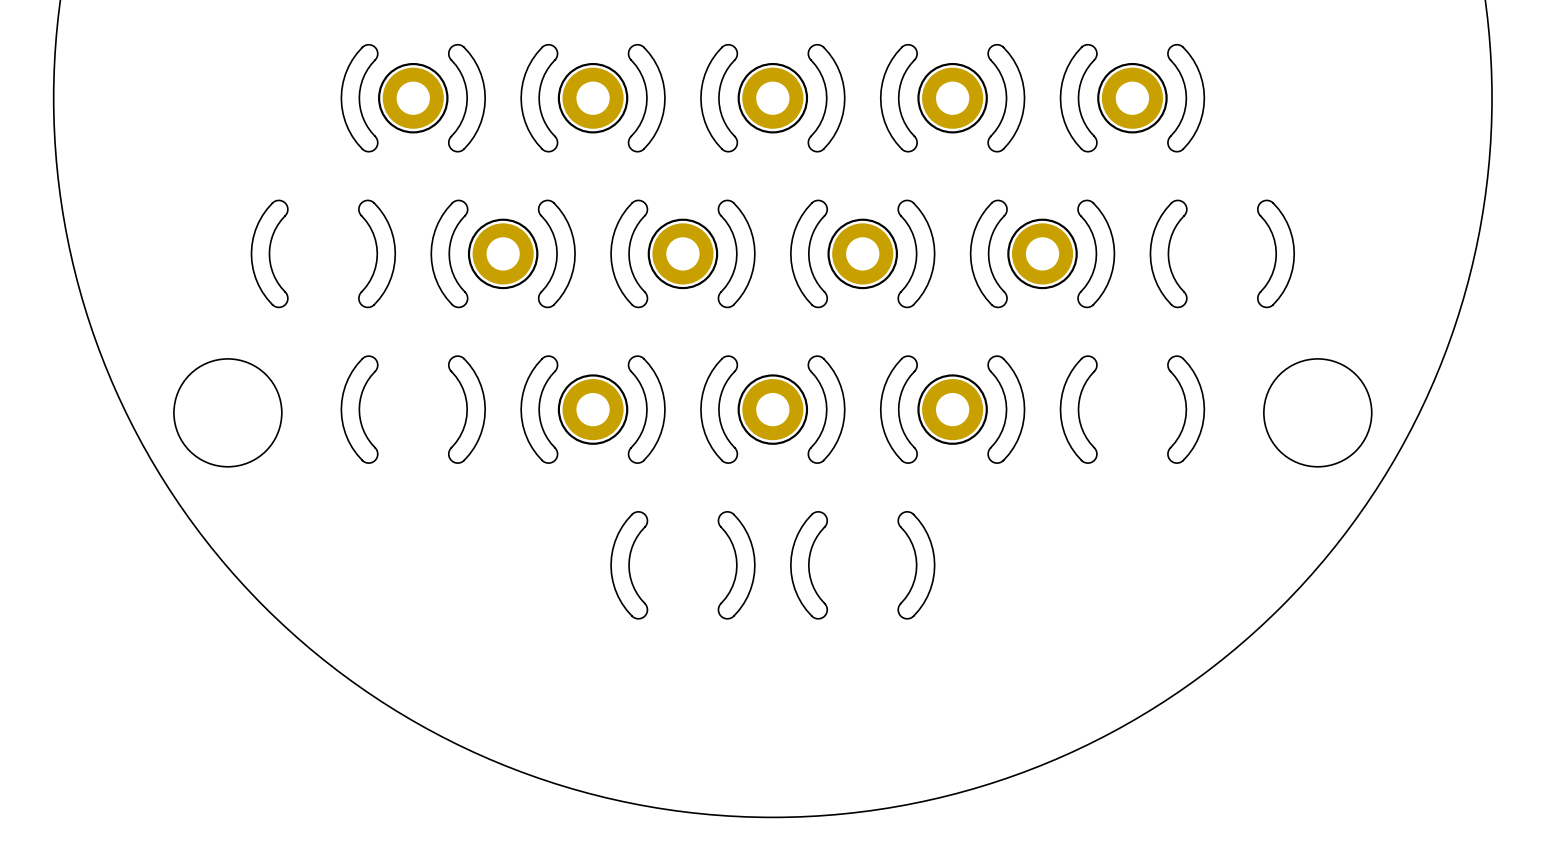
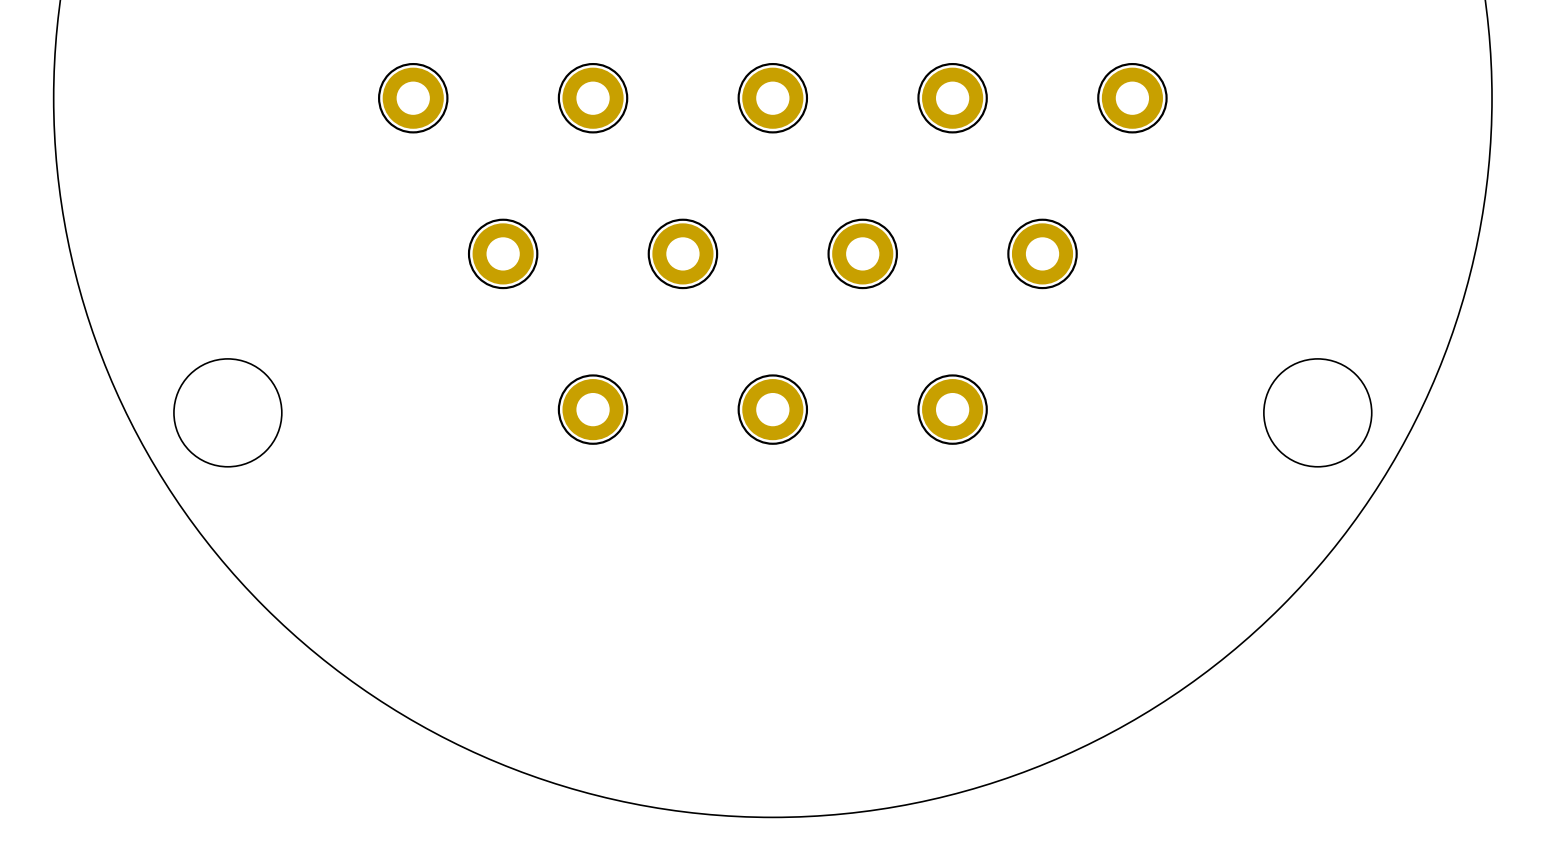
board edge: (362, 47) (367, 44) (372, 45) (377, 53) (376, 58) (364, 74) (359, 92) (362, 116) (377, 141) (375, 148) (369, 151) (363, 149) (352, 136) (345, 121) (341, 106) (341, 90) (345, 74) (352, 59) (362, 47) -> none
board edge: (464, 47) (474, 59) (481, 74) (484, 90) (484, 106) (481, 121) (474, 136) (463, 149) (456, 151) (450, 148) (448, 141) (463, 118) (466, 105) (466, 91) (463, 77) (450, 58) (448, 53) (450, 48) (455, 45) (464, 47) -> none
board edge: (542, 47) (532, 59) (525, 74) (521, 90) (521, 106) (525, 121) (532, 136) (542, 149) (549, 151) (555, 148) (557, 141) (542, 116) (539, 92) (544, 74) (556, 58) (557, 52) (552, 45) (542, 47) -> none
board edge: (643, 47) (635, 45) (628, 52) (629, 58) (642, 77) (646, 91) (646, 105) (642, 118) (628, 141) (630, 148) (636, 151) (643, 149) (653, 136) (660, 121) (664, 106) (664, 90) (660, 74) (653, 59) (643, 47) -> none
board edge: (722, 47) (711, 59) (704, 74) (701, 90) (701, 106) (704, 121) (711, 136) (722, 149) (729, 151) (735, 148) (737, 141) (721, 116) (719, 92) (724, 74) (736, 58) (737, 52) (731, 45) (722, 47) -> none
board edge: (823, 47) (833, 59) (840, 74) (844, 90) (844, 106) (840, 121) (833, 136) (822, 149) (816, 151) (810, 148) (808, 141) (822, 118) (826, 105) (826, 91) (822, 77) (809, 58) (808, 53) (810, 48) (814, 45) (823, 47) -> none
board edge: (901, 47) (911, 45) (917, 52) (915, 58) (904, 74) (899, 92) (901, 116) (916, 141) (915, 148) (908, 151) (901, 149) (891, 136) (884, 121) (881, 106) (881, 90) (884, 74) (891, 59) (901, 47) -> none
board edge: (1003, 47) (994, 45) (988, 52) (989, 58) (1002, 77) (1006, 91) (1006, 105) (1002, 118) (988, 141) (990, 148) (996, 151) (1003, 149) (1013, 136) (1020, 121) (1024, 106) (1024, 90) (1020, 74) (1013, 59) (1003, 47) -> none
board edge: (1081, 47) (1071, 59) (1064, 74) (1060, 90) (1060, 106) (1064, 121) (1071, 136) (1081, 149) (1088, 151) (1095, 148) (1096, 141) (1081, 116) (1078, 92) (1083, 74) (1095, 58) (1096, 52) (1091, 45) (1081, 47) -> none
board edge: (1183, 47) (1193, 59) (1200, 74) (1203, 90) (1203, 106) (1200, 121) (1193, 136) (1182, 149) (1175, 151) (1169, 148) (1168, 141) (1182, 118) (1185, 105) (1185, 91) (1182, 77) (1169, 58) (1168, 52) (1174, 45) (1183, 47) -> none
board edge: (272, 203) (262, 215) (255, 230) (251, 245) (251, 261) (255, 277) (262, 292) (273, 305) (280, 307) (286, 303) (287, 297) (272, 271) (269, 247) (274, 230) (286, 213) (287, 208) (282, 201) (272, 203) -> none
board edge: (374, 203) (365, 200) (358, 208) (360, 213) (373, 233) (376, 246) (376, 260) (373, 274) (359, 296) (360, 303) (367, 307) (374, 304) (384, 292) (391, 277) (394, 261) (394, 245) (391, 230) (384, 215) (374, 203) -> none
board edge: (452, 203) (457, 200) (462, 201) (467, 208) (466, 214) (454, 230) (449, 247) (452, 271) (467, 297) (465, 303) (459, 307) (453, 305) (442, 292) (435, 277) (431, 261) (431, 245) (435, 230) (442, 215) (452, 203) -> none
board edge: (554, 203) (544, 200) (540, 203) (538, 208) (539, 214) (553, 233) (556, 246) (556, 260) (553, 274) (538, 297) (540, 303) (546, 307) (553, 305) (564, 292) (571, 277) (574, 261) (574, 245) (571, 230) (564, 215) (554, 203) -> none
board edge: (632, 203) (622, 215) (615, 230) (611, 245) (611, 261) (615, 277) (622, 292) (632, 304) (639, 307) (645, 303) (647, 296) (632, 271) (629, 247) (634, 230) (646, 214) (647, 208) (642, 201) (636, 200) (632, 203) -> none
board edge: (733, 203) (743, 215) (750, 230) (754, 245) (754, 261) (750, 277) (743, 292) (733, 304) (726, 307) (720, 303) (718, 296) (732, 274) (736, 260) (736, 246) (732, 233) (719, 213) (718, 208) (725, 200) (733, 203) -> none
board edge: (811, 203) (816, 200) (821, 201) (827, 208) (825, 214) (814, 230) (809, 247) (811, 271) (827, 296) (825, 303) (818, 307) (811, 304) (801, 292) (794, 277) (791, 261) (791, 245) (794, 230) (801, 215) (811, 203) -> none
board edge: (913, 203) (923, 215) (930, 230) (934, 245) (934, 261) (930, 277) (923, 292) (912, 305) (906, 307) (900, 303) (898, 297) (912, 274) (916, 260) (916, 246) (912, 233) (899, 214) (898, 208) (900, 203) (904, 200) (913, 203) -> none
board edge: (991, 203) (996, 200) (1001, 201) (1007, 208) (1005, 214) (993, 230) (988, 247) (991, 271) (1006, 296) (1005, 303) (998, 307) (991, 304) (981, 292) (974, 277) (971, 261) (971, 245) (974, 230) (981, 215) (991, 203) -> none
board edge: (1093, 203) (1084, 200) (1078, 208) (1079, 213) (1092, 233) (1096, 246) (1096, 260) (1092, 274) (1078, 296) (1079, 303) (1086, 307) (1093, 304) (1103, 292) (1110, 277) (1114, 261) (1114, 245) (1110, 230) (1103, 215) (1093, 203) -> none
board edge: (1171, 203) (1161, 215) (1154, 230) (1150, 245) (1150, 261) (1154, 277) (1161, 292) (1171, 304) (1178, 307) (1184, 303) (1186, 296) (1171, 271) (1168, 247) (1173, 230) (1185, 213) (1186, 208) (1181, 201) (1171, 203) -> none
board edge: (1273, 203) (1283, 215) (1290, 230) (1293, 245) (1293, 261) (1290, 277) (1283, 292) (1272, 305) (1265, 307) (1259, 303) (1257, 297) (1272, 274) (1275, 260) (1275, 246) (1272, 233) (1259, 214) (1257, 208) (1259, 203) (1264, 200) (1273, 203) -> none
board edge: (362, 358) (372, 356) (377, 363) (376, 369) (364, 386) (359, 403) (362, 427) (377, 452) (375, 459) (369, 463) (362, 460) (352, 447) (345, 433) (341, 417) (341, 401) (345, 385) (352, 371) (362, 358) -> none
board edge: (464, 358) (474, 371) (481, 385) (484, 401) (484, 417) (481, 433) (474, 447) (464, 460) (457, 463) (450, 459) (448, 452) (463, 430) (466, 416) (466, 402) (463, 388) (450, 369) (448, 364) (450, 359) (455, 356) (464, 358) -> none
board edge: (542, 358) (552, 356) (557, 363) (556, 369) (544, 386) (539, 403) (542, 427) (557, 452) (555, 459) (549, 463) (542, 460) (532, 447) (525, 433) (521, 417) (521, 401) (525, 385) (532, 371) (542, 358) -> none
board edge: (643, 358) (634, 356) (630, 359) (628, 364) (629, 369) (642, 388) (646, 402) (646, 416) (642, 430) (628, 452) (630, 459) (636, 463) (643, 461) (653, 447) (660, 433) (664, 417) (664, 401) (660, 385) (653, 371) (643, 358) -> none
board edge: (722, 358) (711, 371) (704, 385) (701, 401) (701, 417) (704, 433) (711, 447) (722, 460) (728, 463) (735, 459) (737, 452) (721, 427) (719, 403) (724, 386) (736, 369) (737, 363) (731, 356) (722, 358) -> none
board edge: (823, 358) (833, 371) (840, 385) (844, 401) (844, 417) (840, 433) (833, 447) (823, 460) (816, 463) (810, 459) (808, 452) (822, 430) (826, 416) (826, 402) (822, 388) (809, 369) (808, 364) (810, 359) (814, 356) (823, 358) -> none
board edge: (901, 358) (891, 371) (884, 385) (881, 401) (881, 417) (884, 433) (891, 447) (901, 460) (908, 463) (915, 459) (916, 452) (901, 427) (899, 403) (904, 386) (915, 369) (917, 363) (911, 356) (901, 358) -> none
board edge: (1003, 358) (994, 356) (990, 359) (988, 364) (989, 369) (1002, 388) (1006, 402) (1006, 416) (1002, 430) (988, 452) (990, 459) (995, 463) (1002, 461) (1013, 447) (1020, 433) (1024, 417) (1024, 401) (1020, 385) (1013, 371) (1003, 358) -> none
board edge: (1081, 358) (1071, 371) (1064, 385) (1060, 401) (1060, 417) (1064, 433) (1071, 447) (1081, 460) (1088, 463) (1095, 459) (1096, 452) (1081, 427) (1078, 403) (1083, 386) (1095, 369) (1096, 364) (1091, 356) (1086, 356) (1081, 358) -> none
board edge: (1183, 358) (1193, 371) (1200, 385) (1203, 401) (1203, 417) (1200, 433) (1193, 447) (1182, 461) (1175, 463) (1169, 459) (1168, 452) (1182, 430) (1185, 416) (1185, 402) (1182, 388) (1169, 369) (1167, 364) (1169, 359) (1174, 356) (1183, 358) -> none
board edge: (632, 514) (622, 527) (615, 541) (611, 557) (611, 573) (615, 589) (622, 603) (632, 616) (639, 618) (645, 615) (647, 608) (632, 583) (629, 559) (634, 541) (646, 525) (647, 520) (642, 512) (636, 511) (632, 514) -> none
board edge: (733, 514) (743, 527) (750, 541) (754, 557) (754, 573) (750, 589) (743, 603) (733, 616) (726, 618) (720, 615) (718, 608) (732, 585) (736, 572) (736, 558) (732, 544) (719, 525) (718, 519) (725, 512) (733, 514) -> none
board edge: (811, 514) (816, 511) (821, 512) (827, 520) (825, 525) (814, 541) (809, 559) (811, 583) (827, 608) (825, 615) (818, 618) (811, 616) (801, 603) (794, 589) (791, 573) (791, 557) (794, 541) (801, 527) (811, 514) -> none
board edge: (913, 514) (923, 527) (930, 541) (934, 557) (934, 573) (930, 589) (923, 603) (912, 616) (906, 618) (900, 615) (898, 608) (912, 585) (916, 572) (916, 558) (912, 544) (899, 525) (898, 520) (900, 515) (904, 512) (913, 514) -> none

